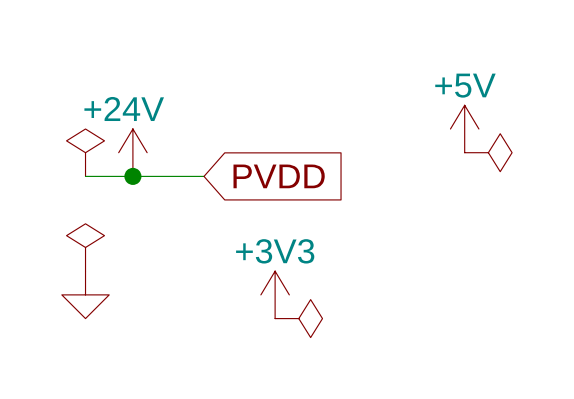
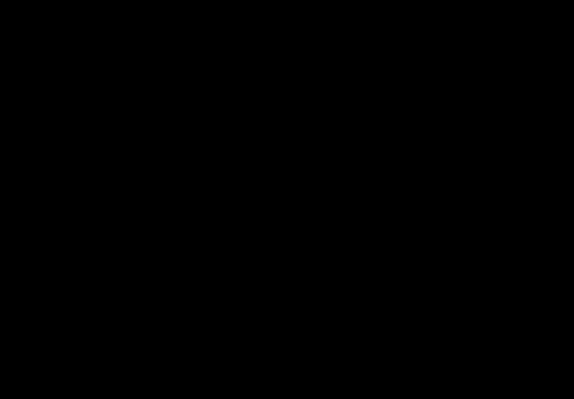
power symbol: +5V (464, 129) -> none
power symbol: (85, 152) -> none
power symbol: +24V (132, 152) -> none
power symbol: (488, 152) -> none
wire: (85, 176) (204, 176) -> none
junction: (132, 176) -> none
global label: PVDD (279, 176) -> none
power symbol: (85, 247) -> none
power symbol: (85, 294) -> none
power symbol: +3V3 (275, 294) -> none
power symbol: (298, 318) -> none

